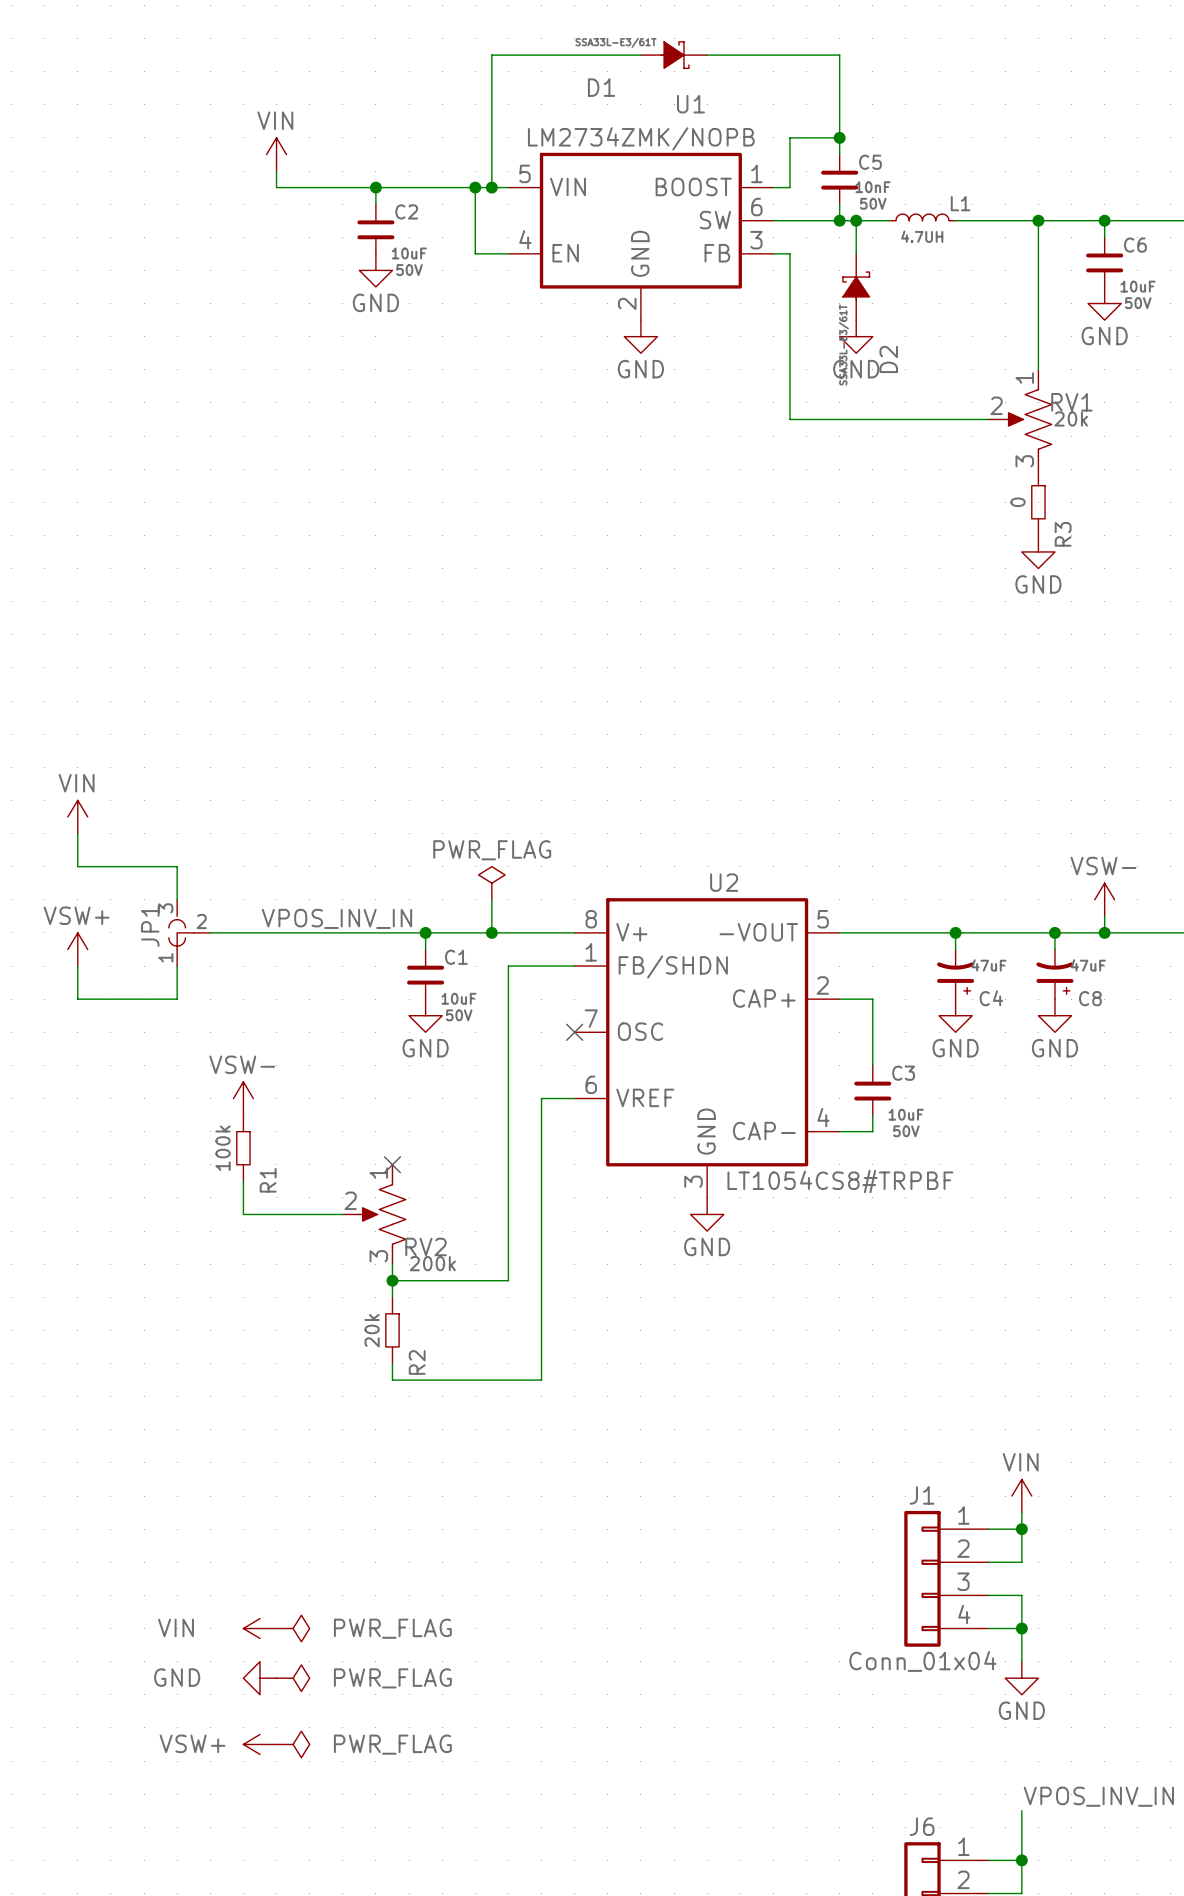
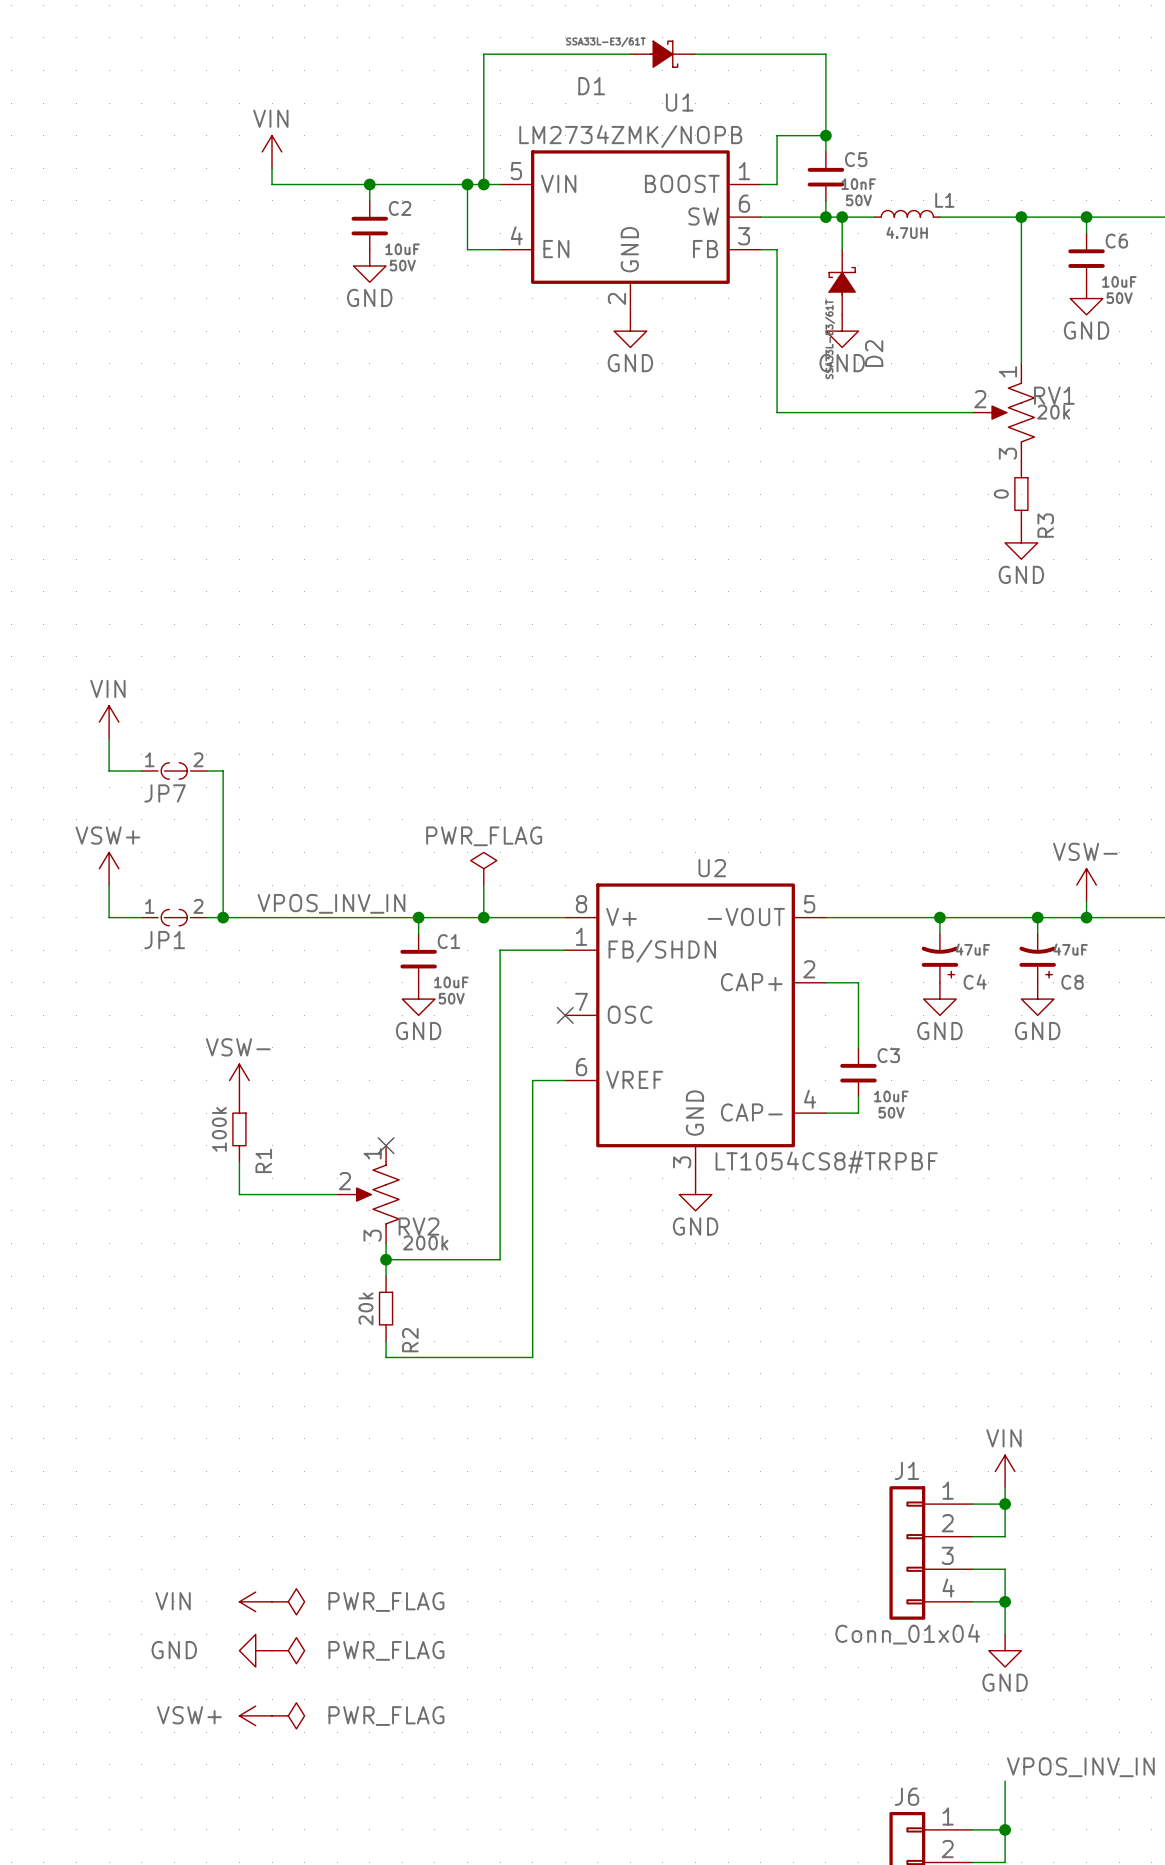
wire: none -> (109, 738) (109, 770) (141, 770)
JP7: none -> (174, 770)
wire: none -> (206, 770) (223, 770) (223, 917)
power symbol position: VIN (77, 816) -> VIN (109, 722)
wire: (77, 833) (77, 866) (177, 866) (177, 899) -> none
wire: none -> (109, 885) (109, 917) (141, 917)
JP1 symbol: [168, 899, 211, 967] -> [141, 909, 207, 926]
JP1 name position: JP1 (150, 926) -> JP1 (164, 940)
junction: none -> (223, 917)
power symbol position: VSW+ (77, 949) -> VSW+ (109, 868)
wire: (77, 966) (77, 999) (177, 999) (177, 966) -> none

